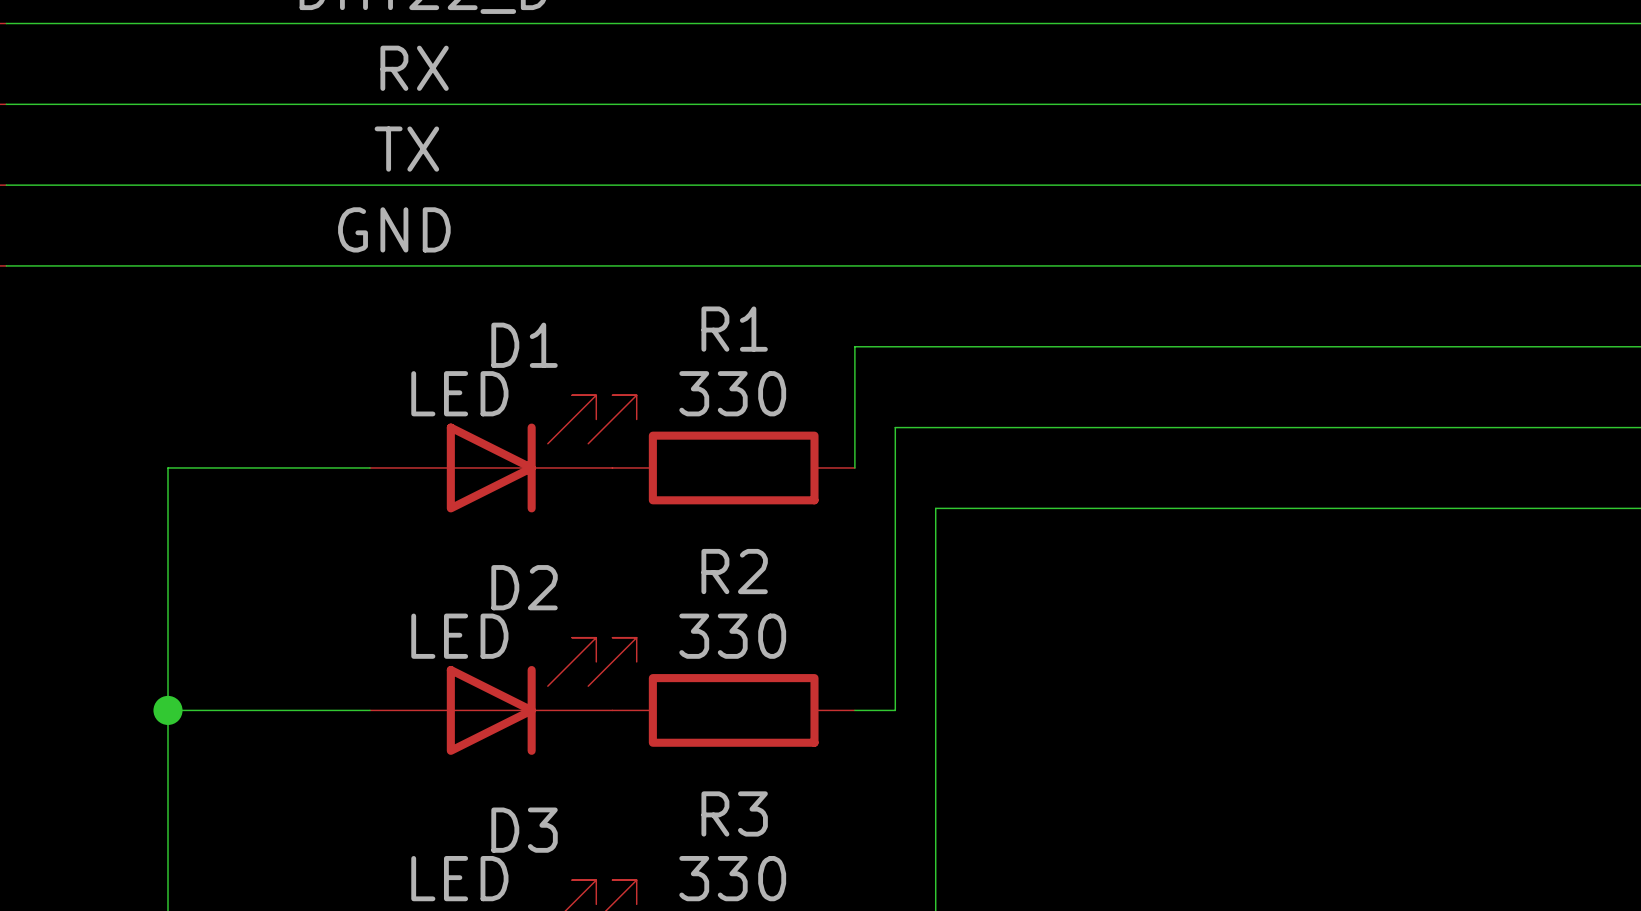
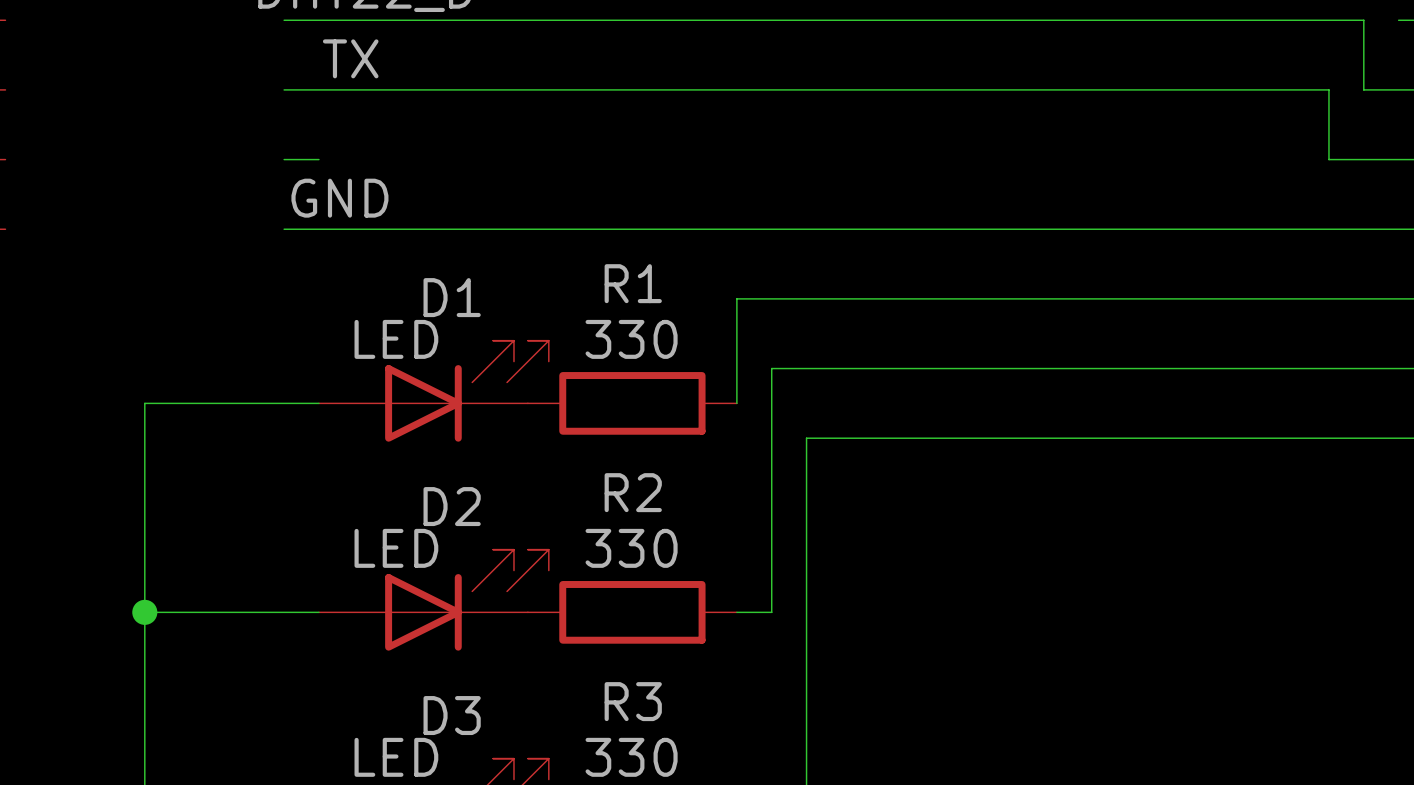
wire: (6, 23) (329, 23) -> none
wire: (1582, 23) (1622, 23) -> (1363, 20) (1363, 89)
label: RX (414, 68) -> TX (350, 58)
wire: (6, 104) (329, 104) -> none
wire: (1541, 104) (1582, 104) -> (1328, 89) (1328, 159)
label: TX (406, 149) -> none
wire: (6, 185) (329, 185) -> none
wire: (370, 185) (1541, 185) -> none
wire: (6, 265) (329, 265) -> none

